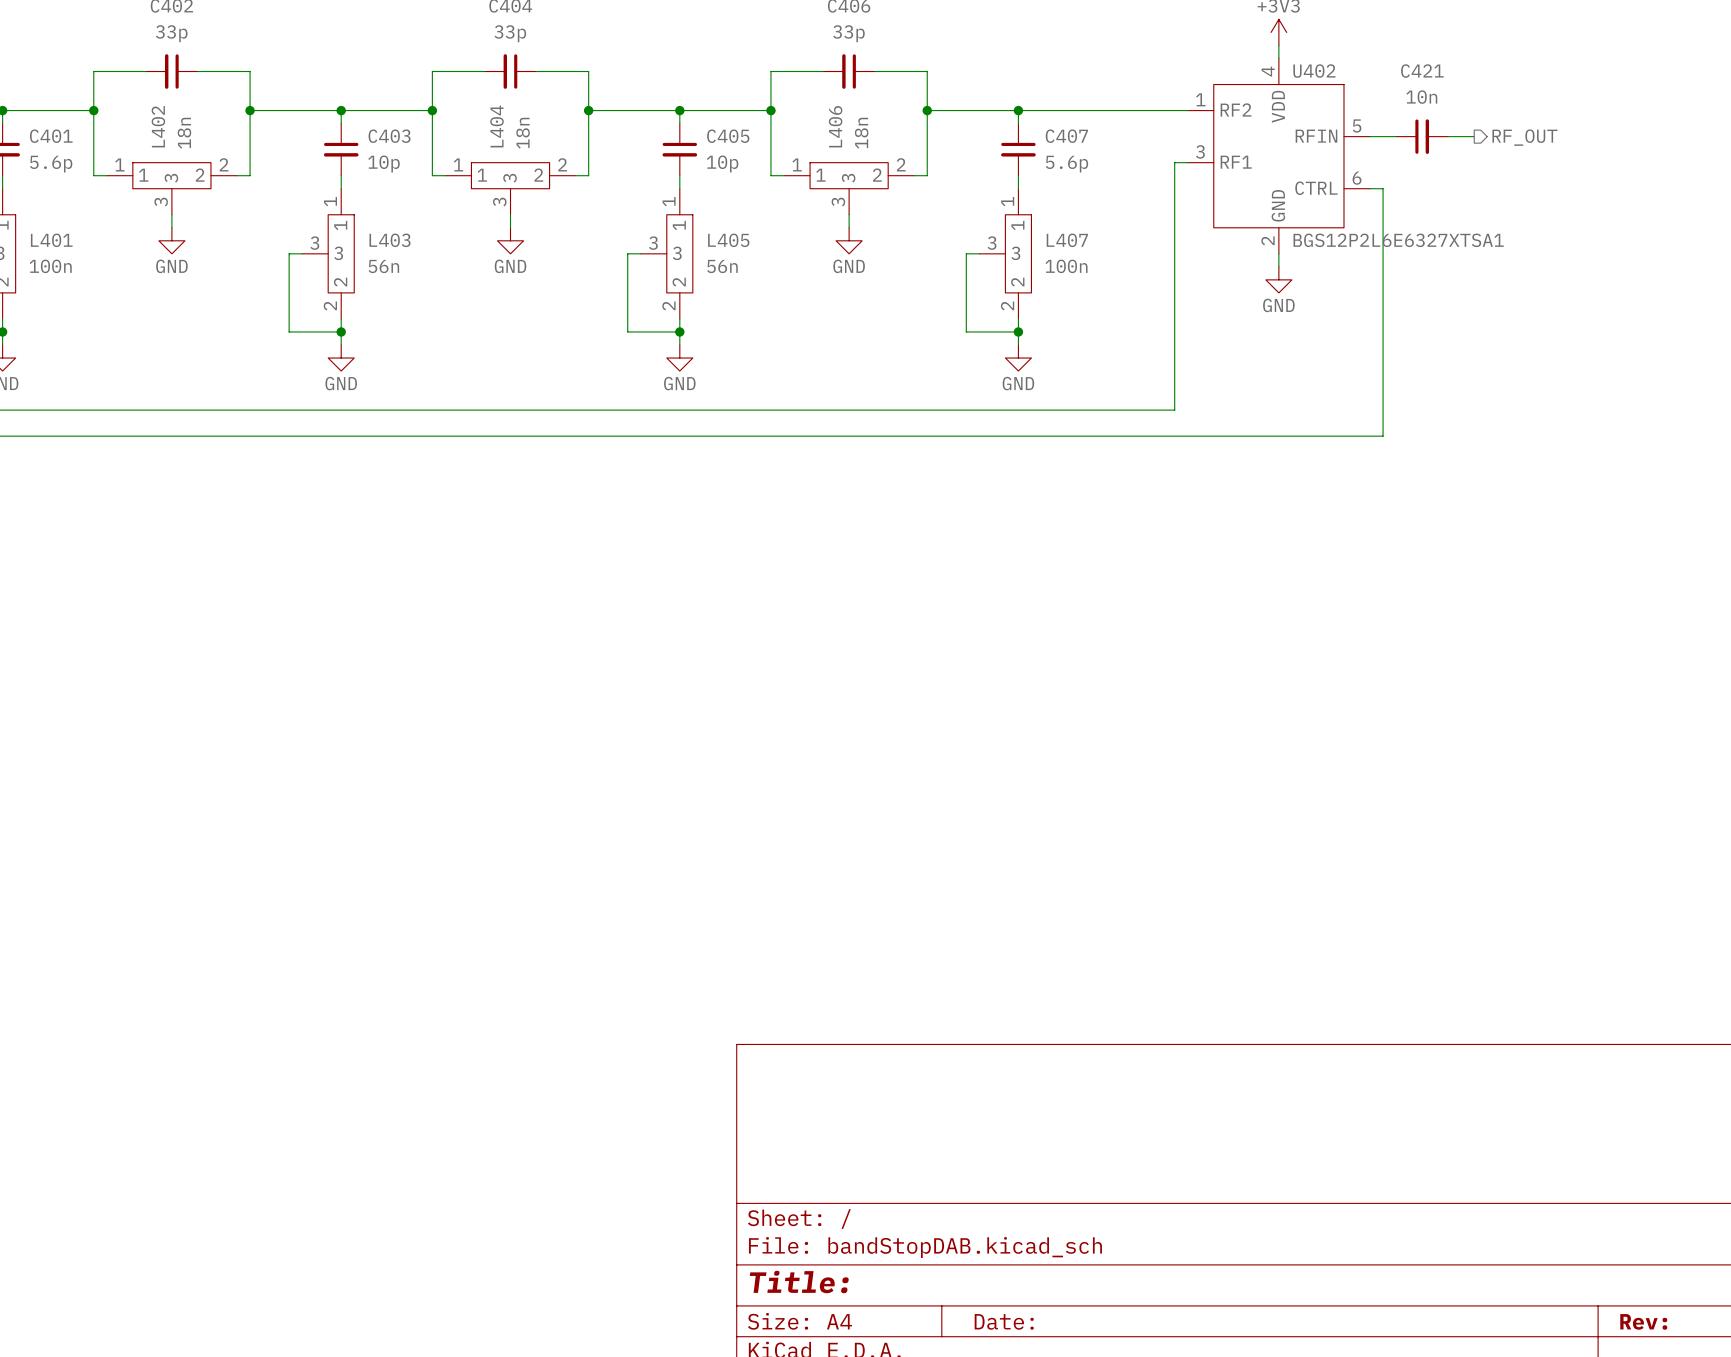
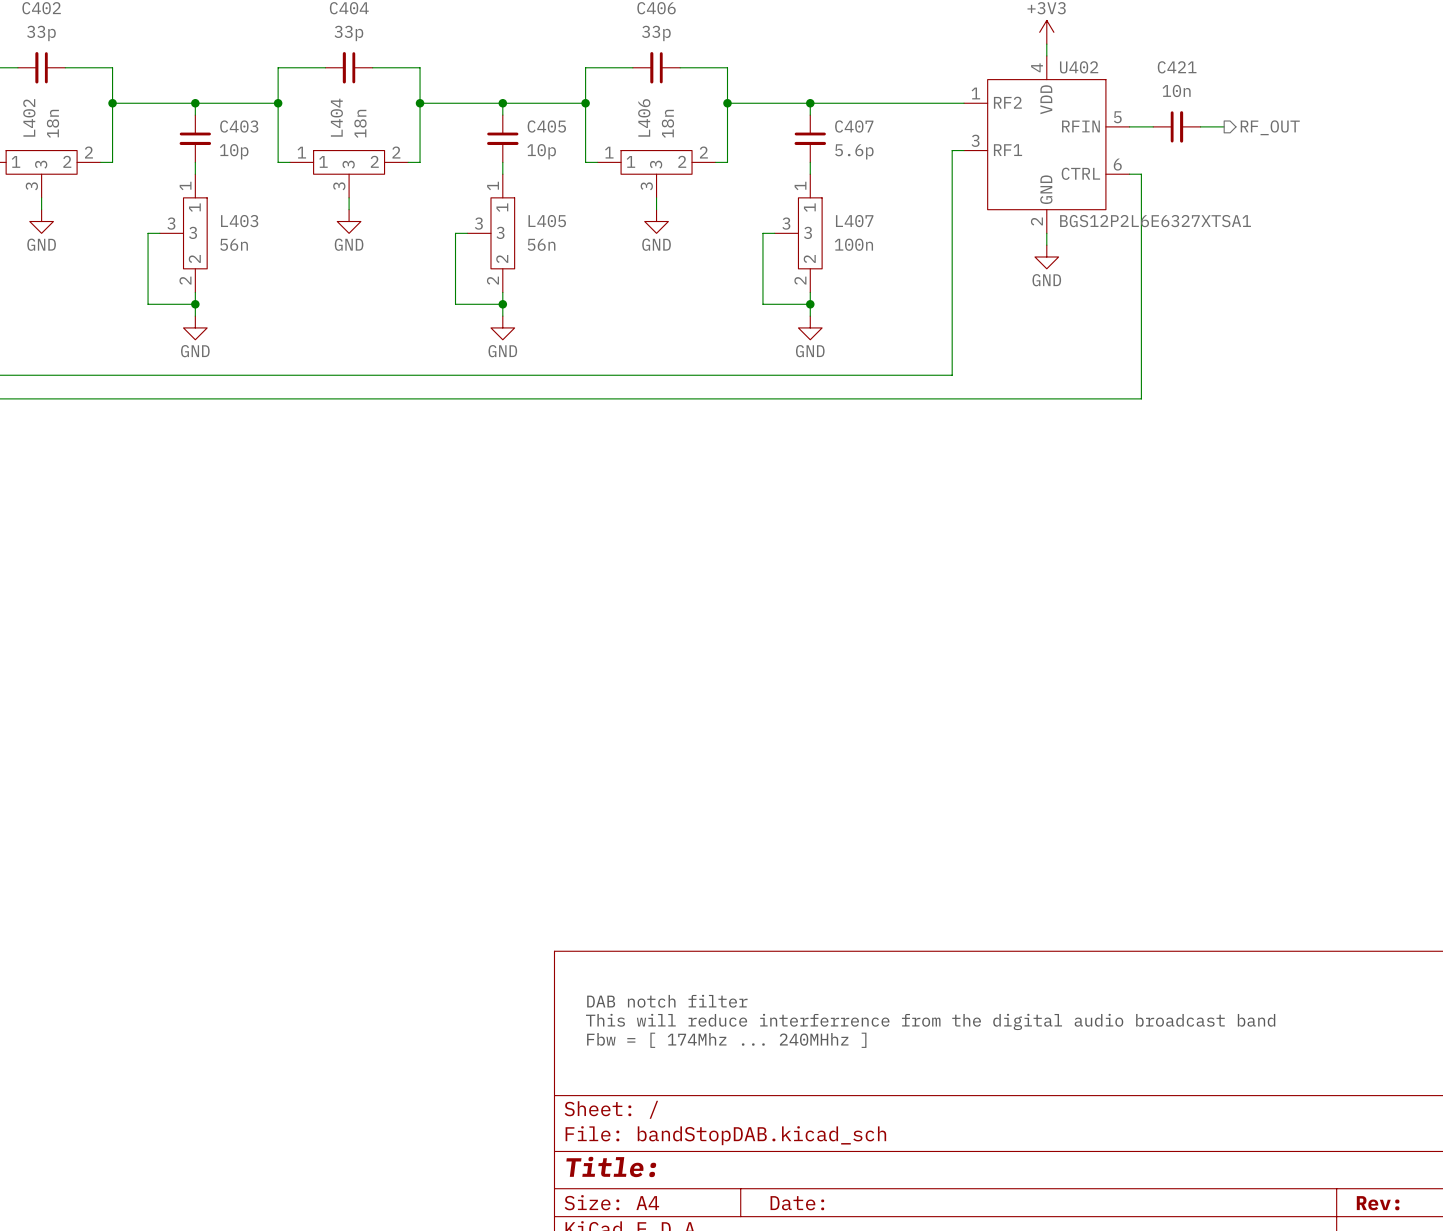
text: none -> DAB notch filter (667, 1001)
text: none -> This will reduce interferrence from the digital audio broadcast band (930, 1021)
text: none -> Fbw = [ 174Mhz ... 240MHhz ] (726, 1040)

